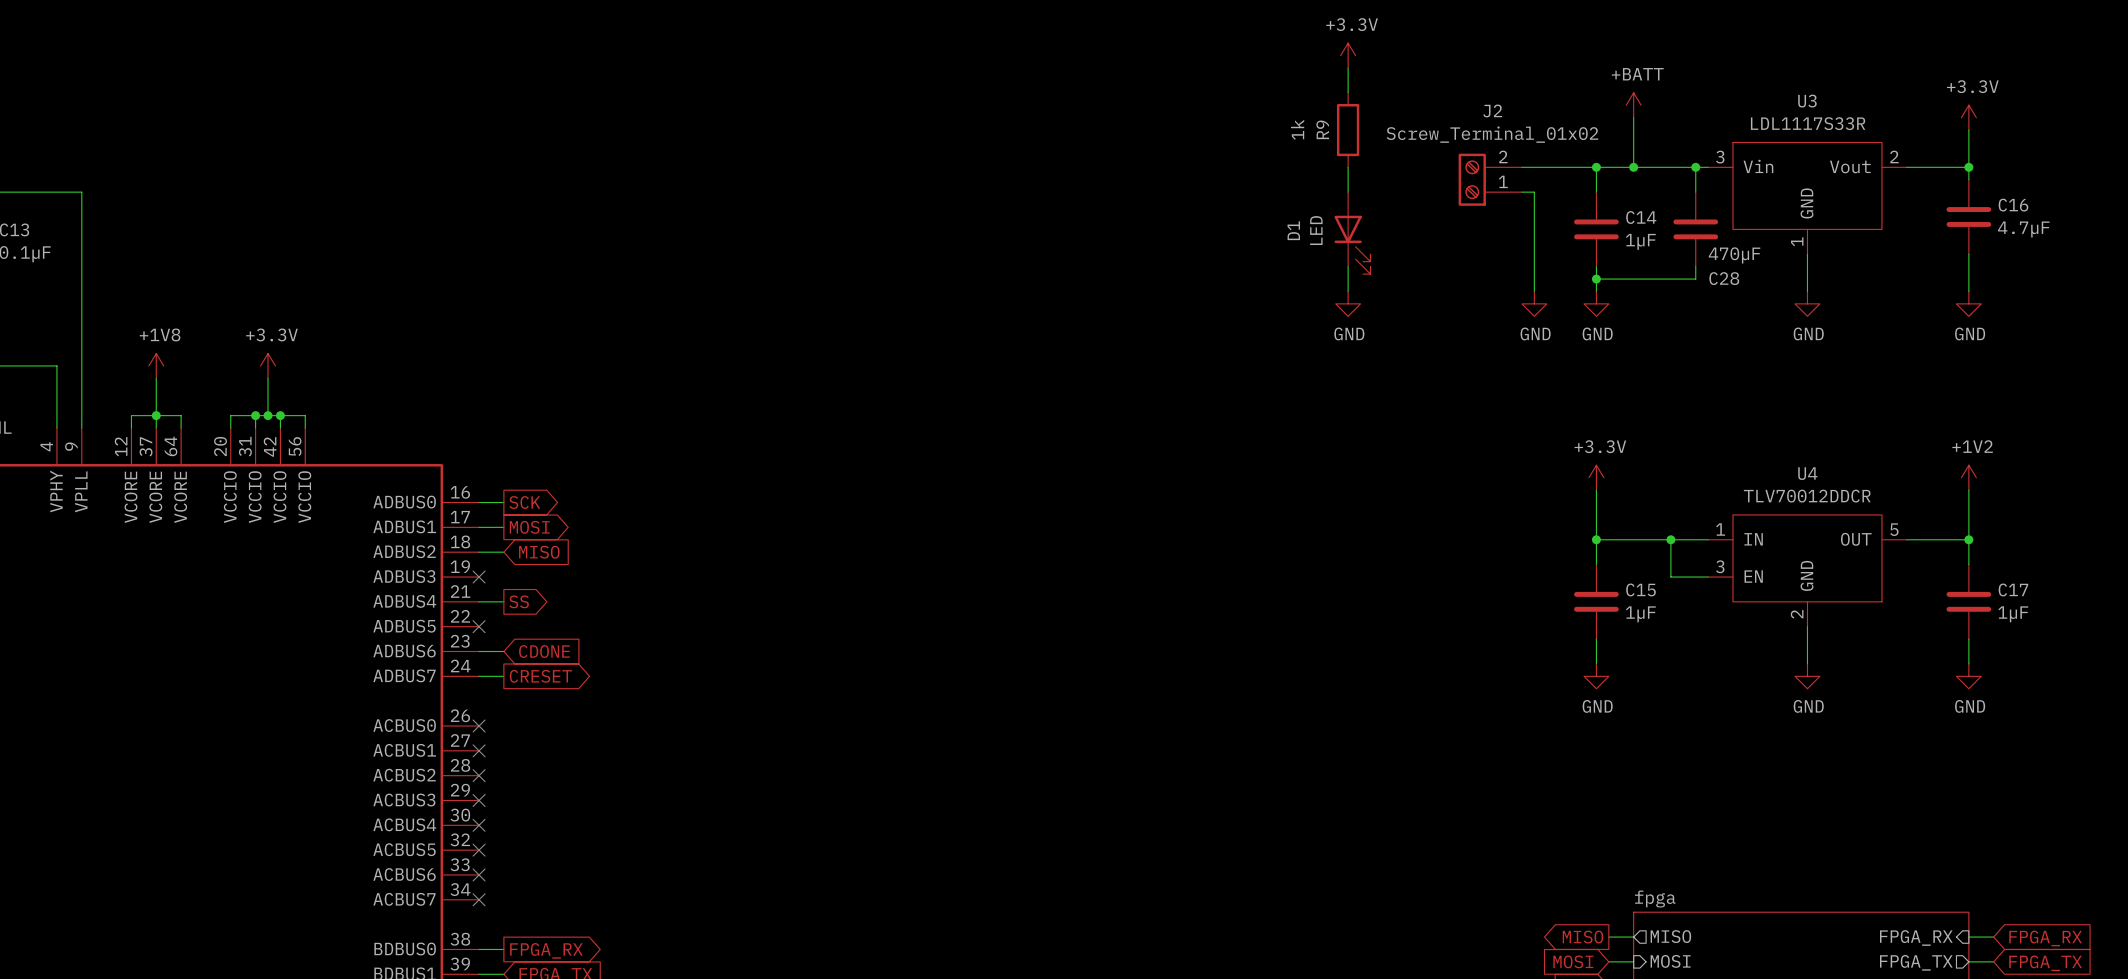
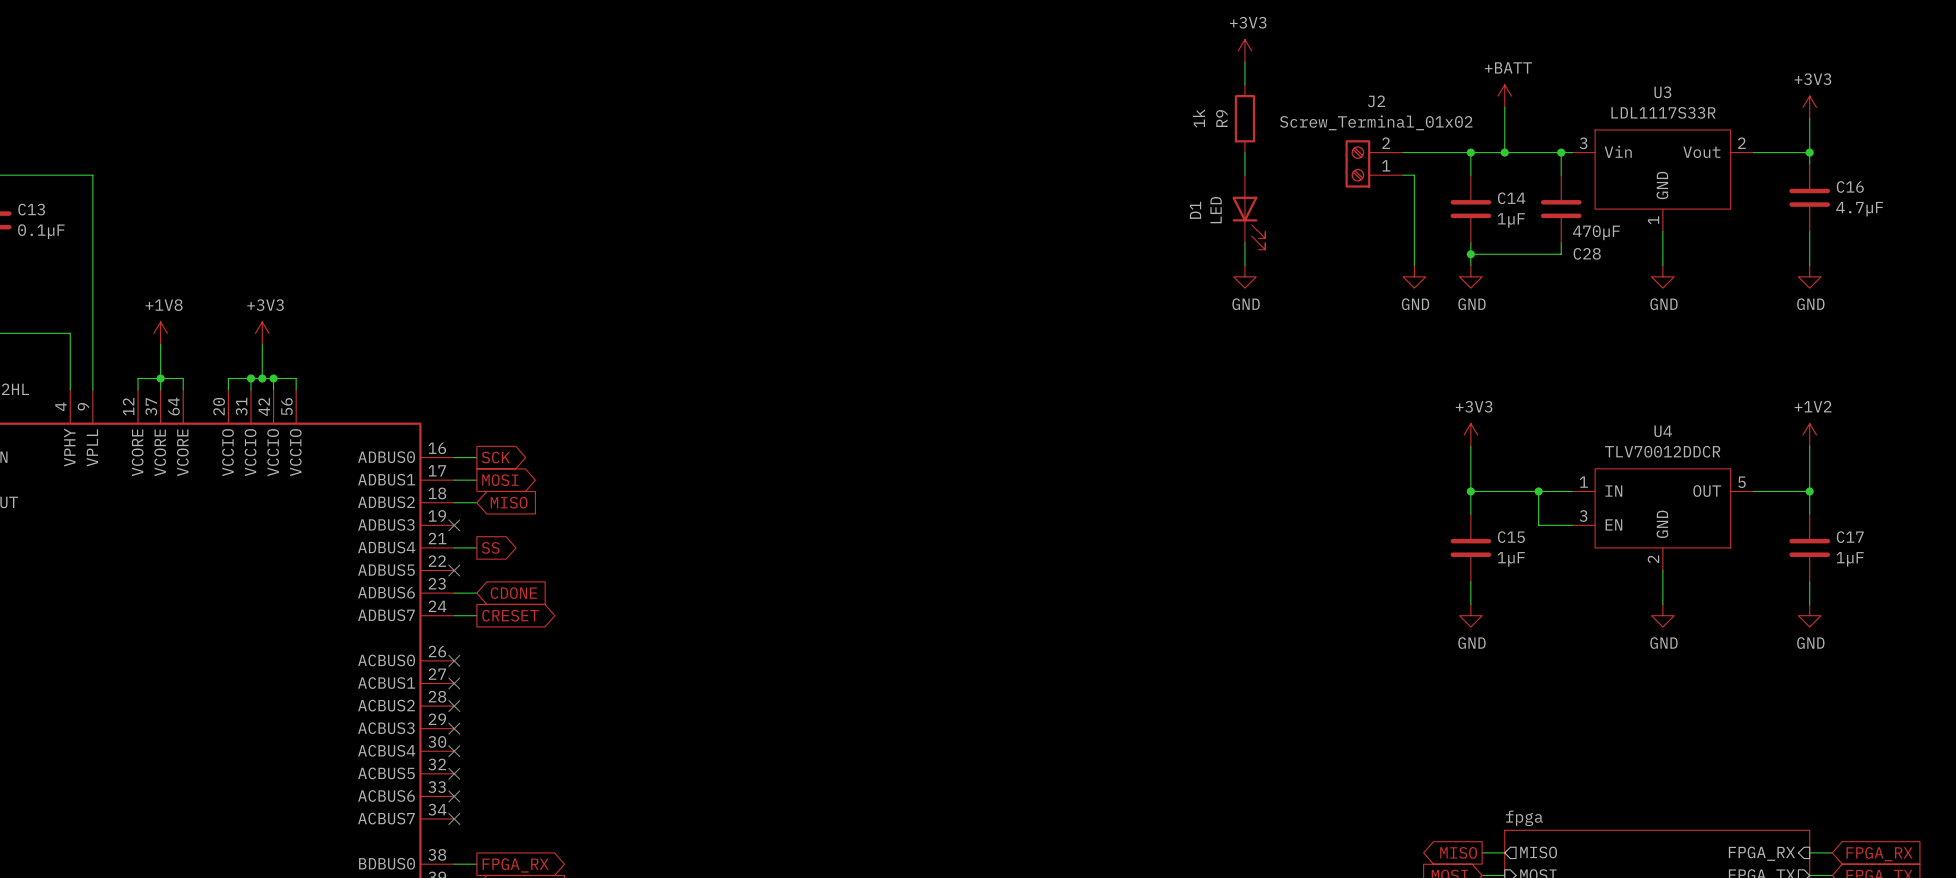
power symbol: +3.3V (1348, 55) -> +3V3 (1244, 50)
power symbol: +3.3V (1968, 117) -> +3V3 (1809, 107)
power symbol: +3.3V (268, 365) -> +3V3 (262, 333)
power symbol: +3.3V (1596, 477) -> +3V3 (1470, 434)

